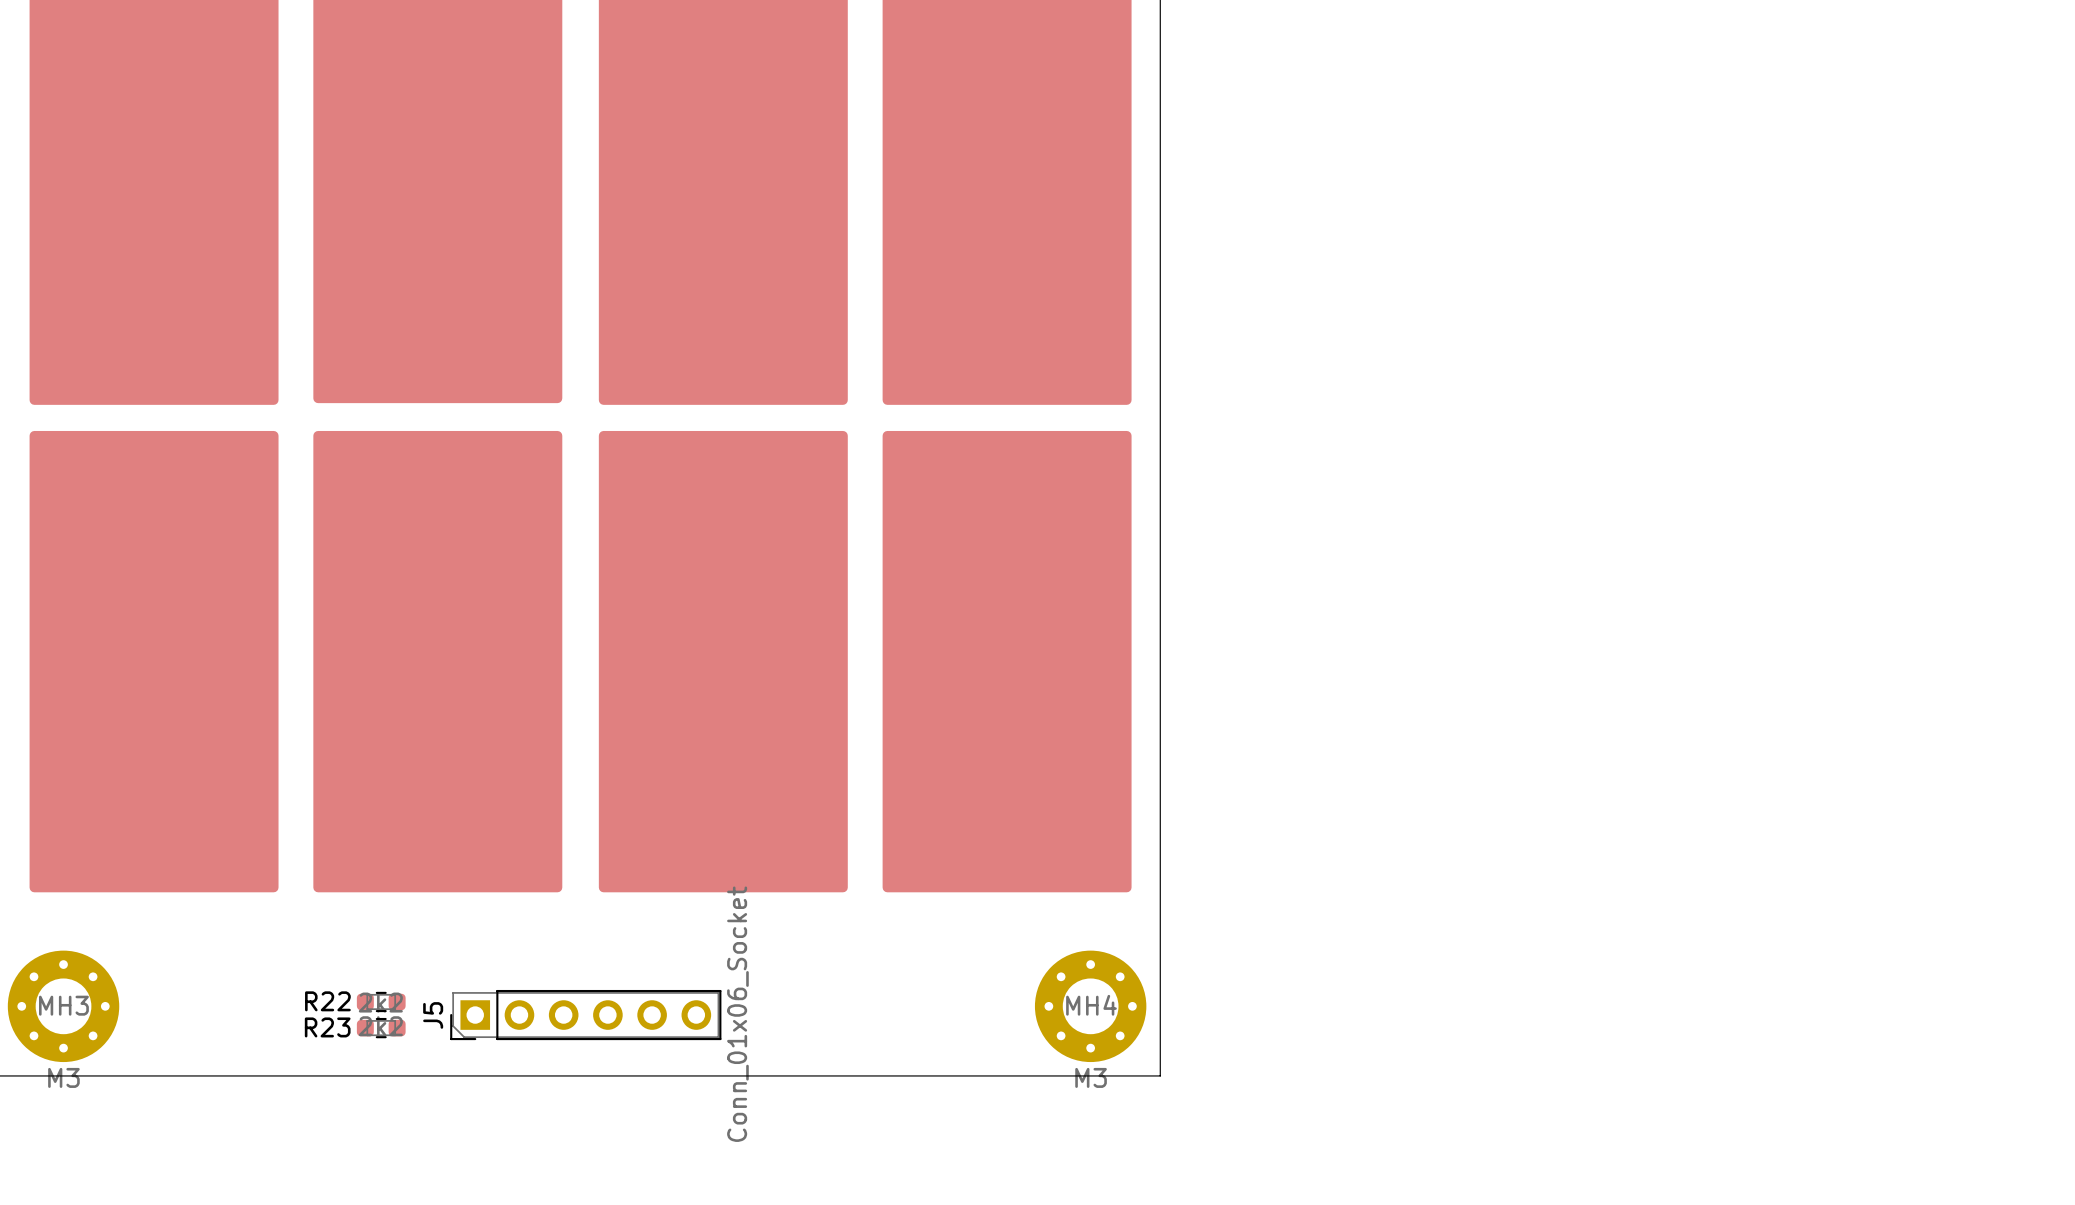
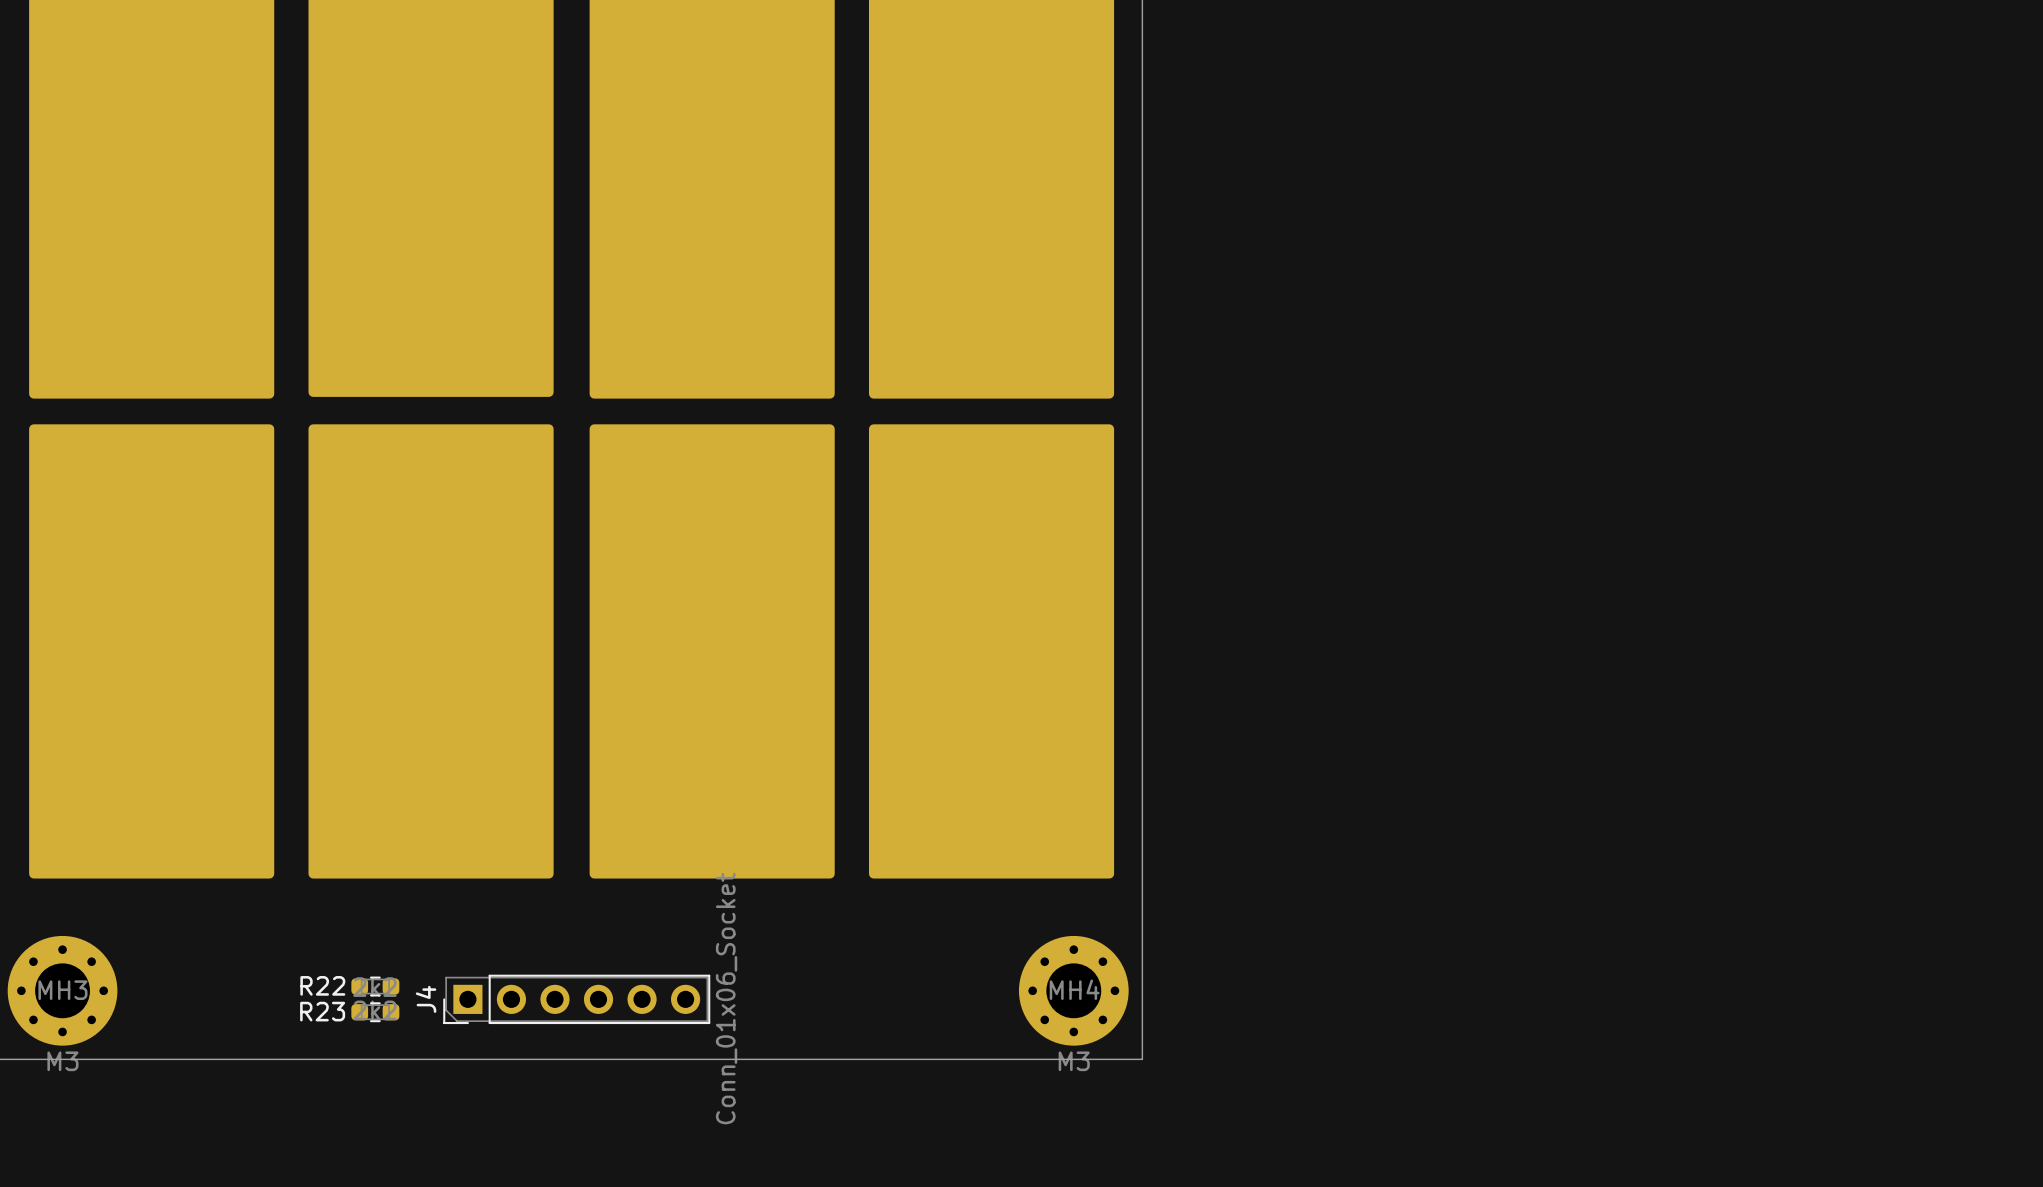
J5 name: J5 (433, 1015) -> J4 (426, 999)

